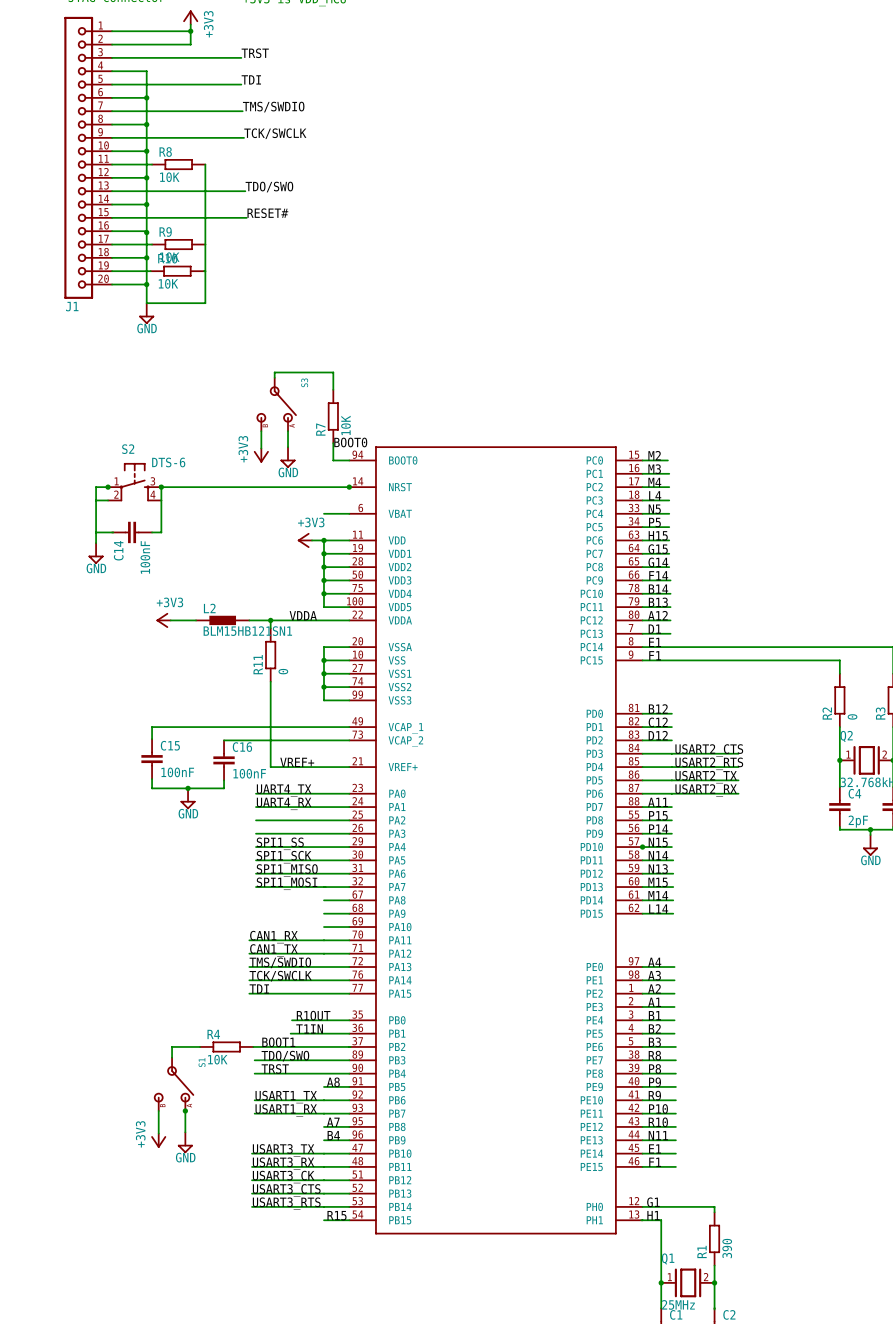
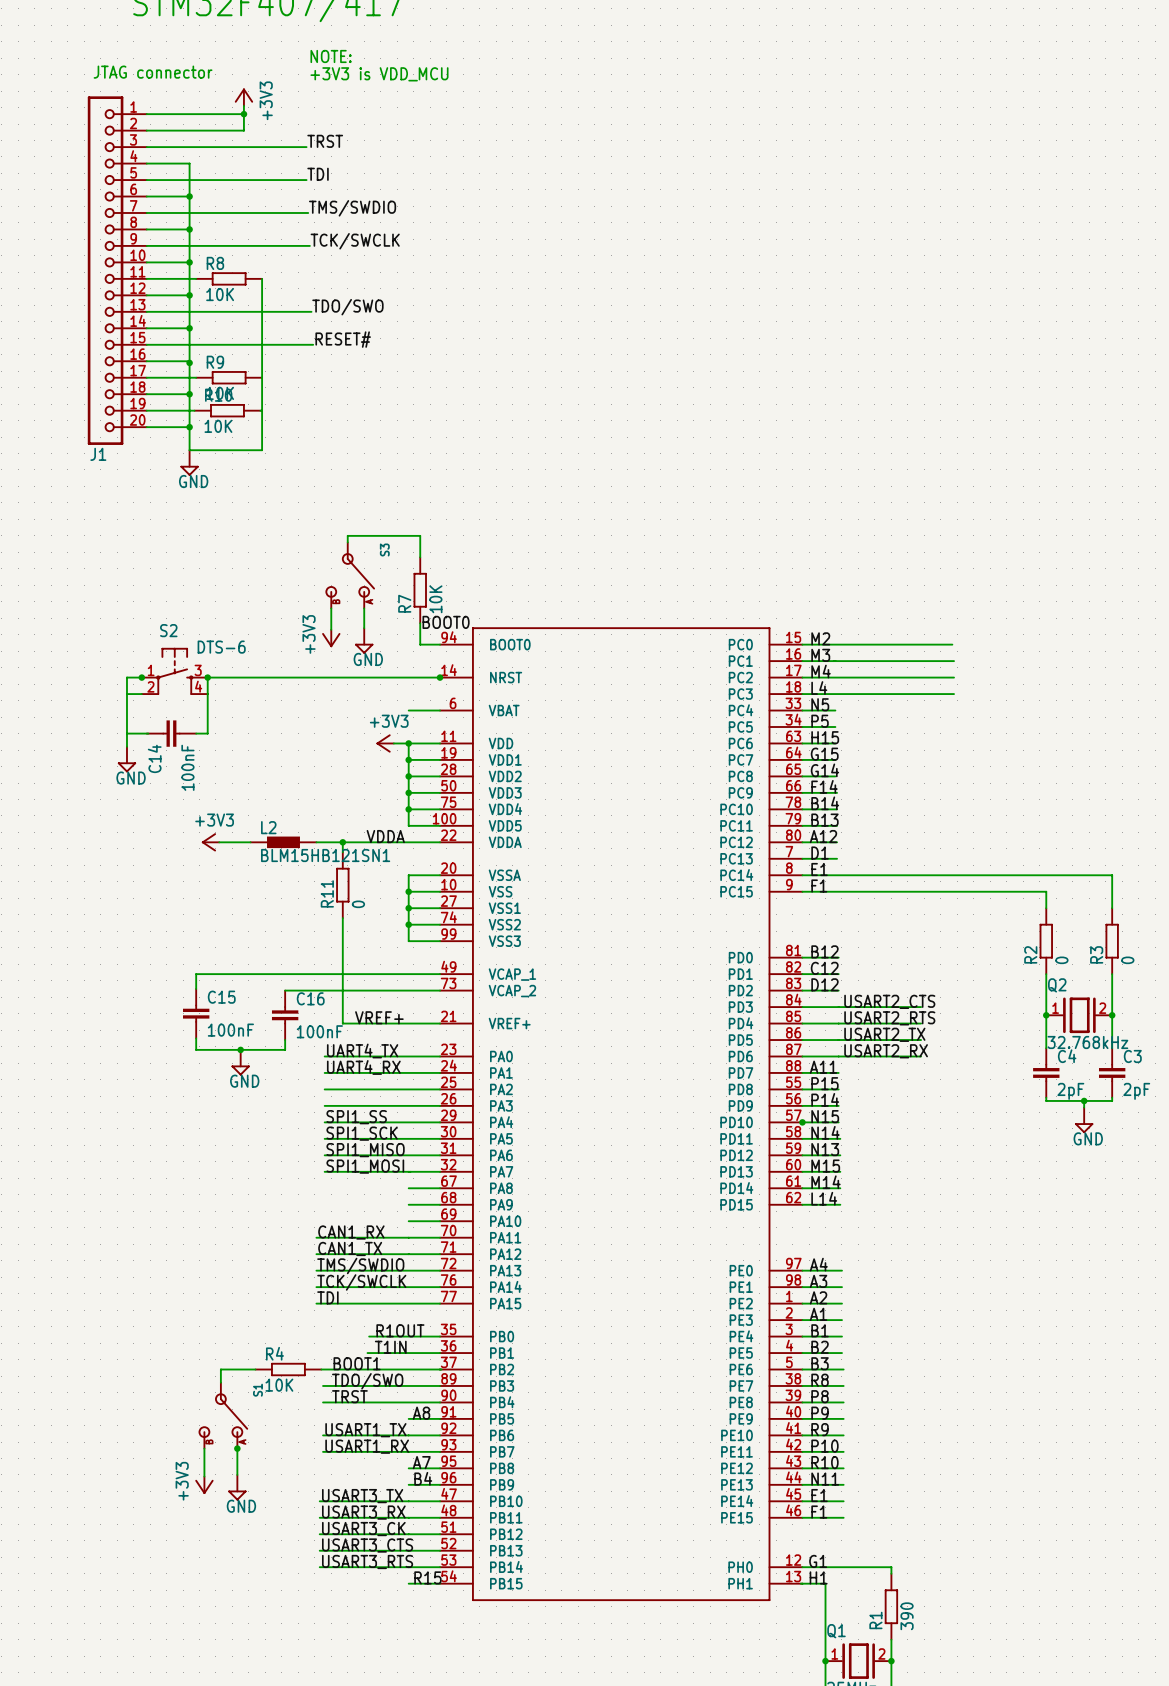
wire: none -> (833, 644) (952, 644)
wire: none -> (835, 661) (954, 661)
wire: none -> (835, 677) (954, 677)
wire: none -> (835, 694) (954, 694)

